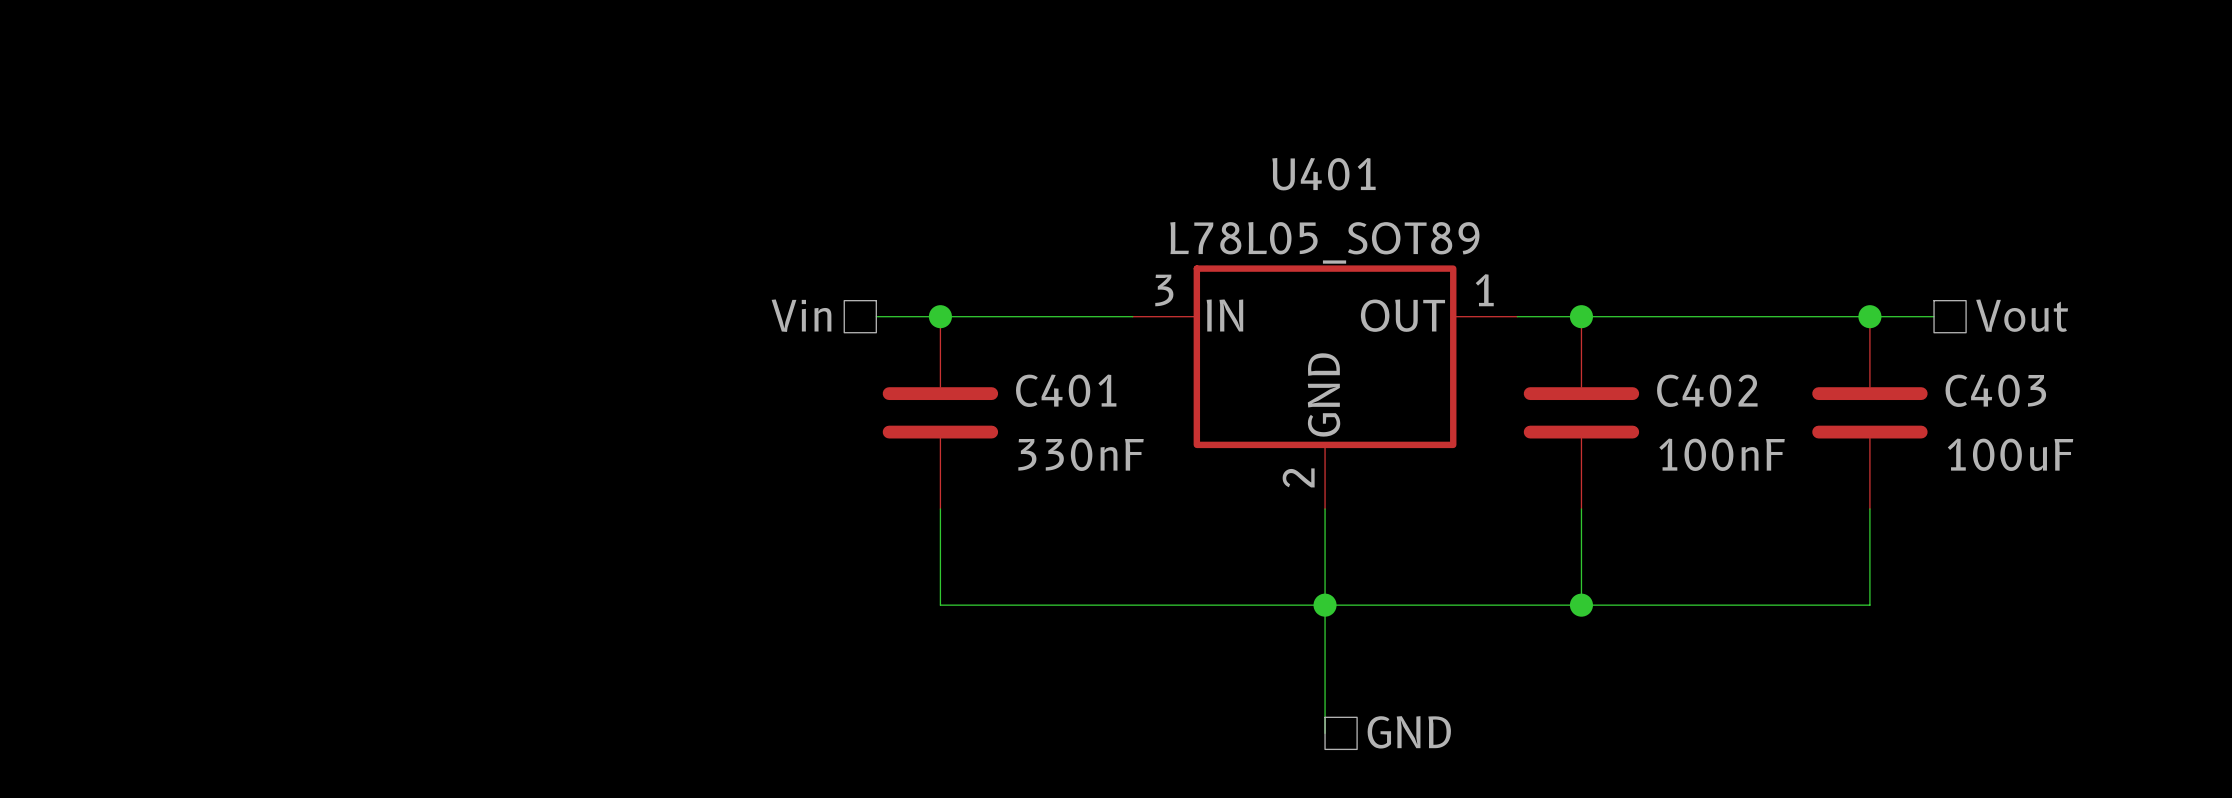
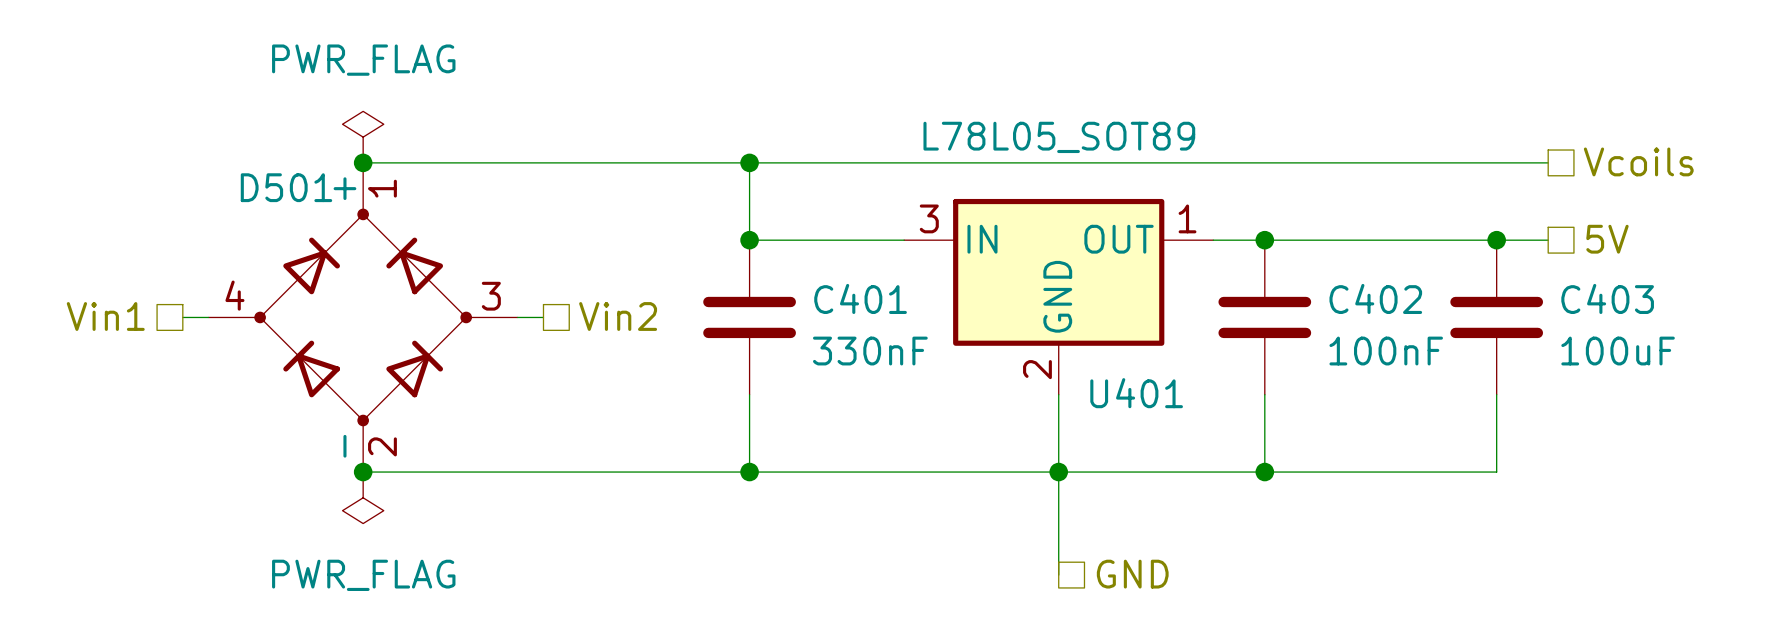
U401 name position: U401 (1323, 174) -> U401 (1136, 393)
power symbol: none -> PWR_FLAG (363, 137)
hierarchical label: none -> Vcoils (1638, 161)
wire: none -> (363, 162) (1548, 162)
junction: none -> (363, 162)
junction: none -> (749, 162)
U401 value position: L78L05_SOT89 (1324, 242) -> L78L05_SOT89 (1059, 137)
hierarchical label: Vin (801, 315) -> none
hierarchical label: Vout (2022, 315) -> 5V (1607, 239)
wire: (876, 316) (940, 316) -> (749, 162) (749, 240)
hierarchical label: none -> Vin1 (105, 316)
hierarchical label: none -> Vin2 (618, 316)
wire: none -> (182, 317) (208, 317)
D501: none -> (363, 317)
wire: none -> (517, 317) (543, 317)
wire: none -> (363, 472) (749, 472)
junction: none -> (363, 472)
junction: none -> (749, 472)
power symbol: none -> PWR_FLAG (363, 497)

